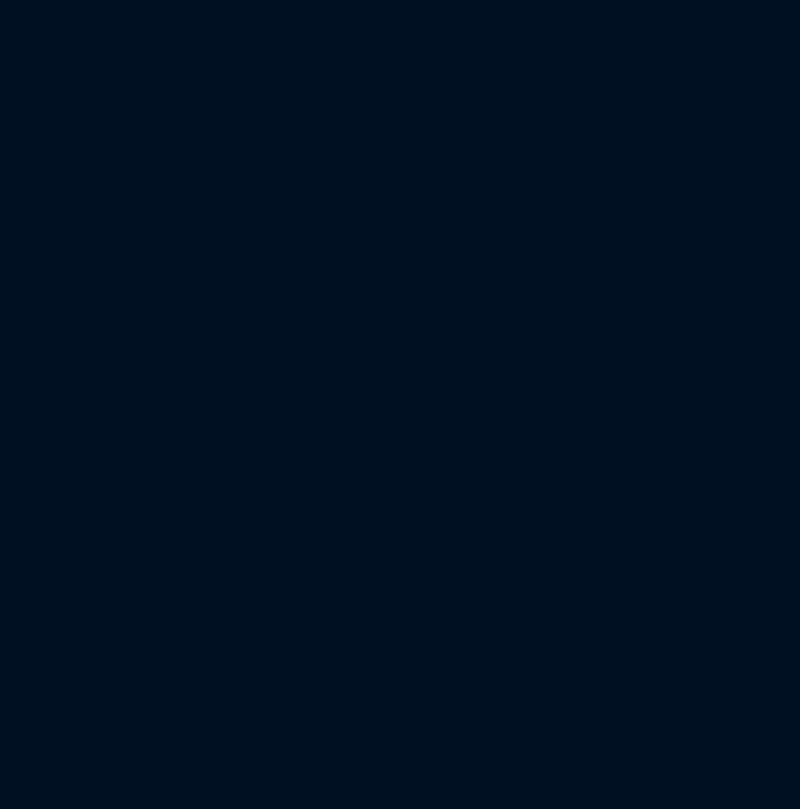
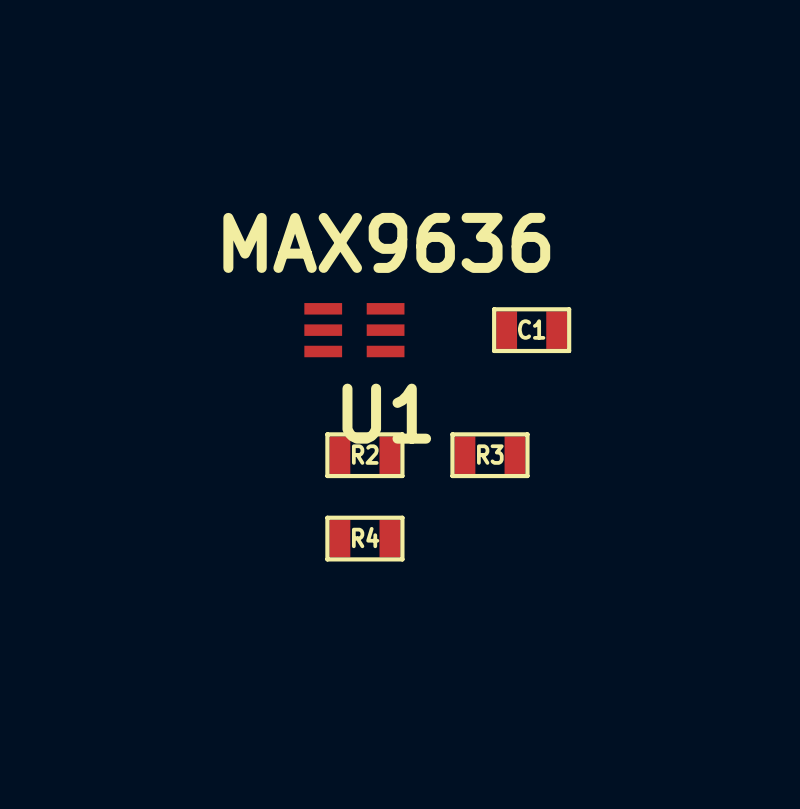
U1: none -> MAX9636 (354, 330)
C1: none -> (531, 330)
R2: none -> (364, 455)
R3: none -> (489, 455)
R4: none -> (364, 538)

